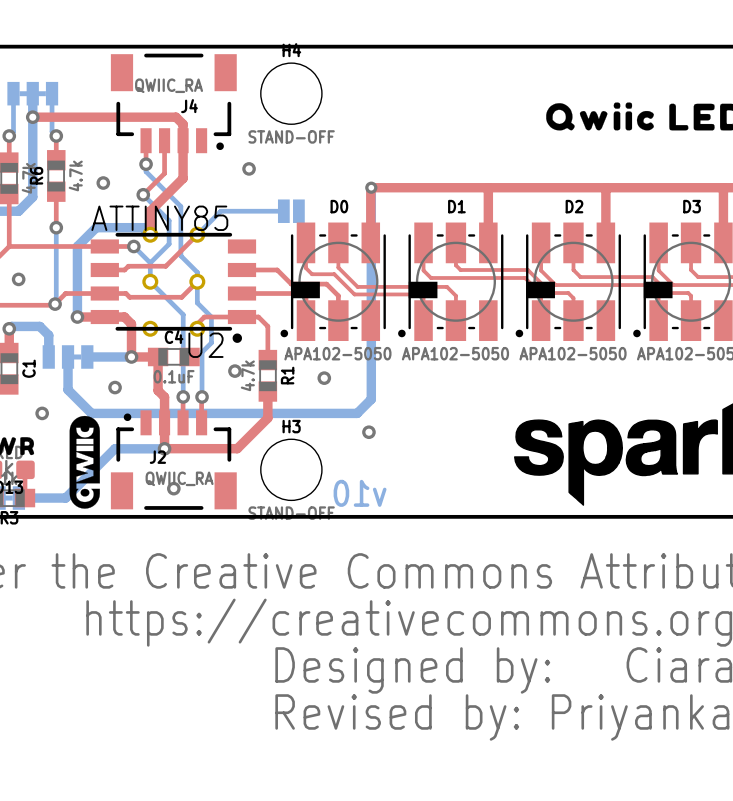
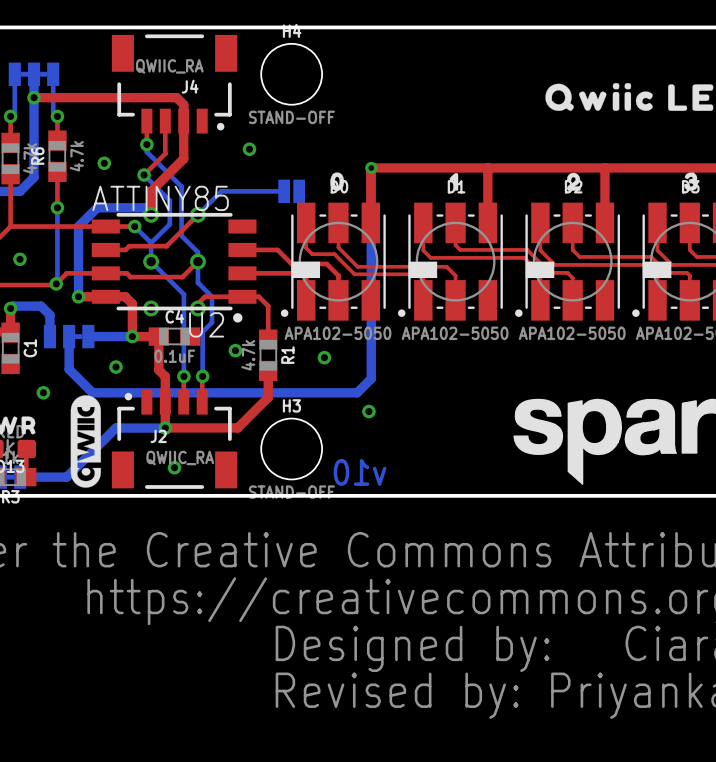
drawing: none -> [330, 172, 345, 191]
drawing: none -> [449, 173, 459, 191]
drawing: none -> [566, 172, 581, 191]
drawing: none -> [684, 172, 698, 191]

